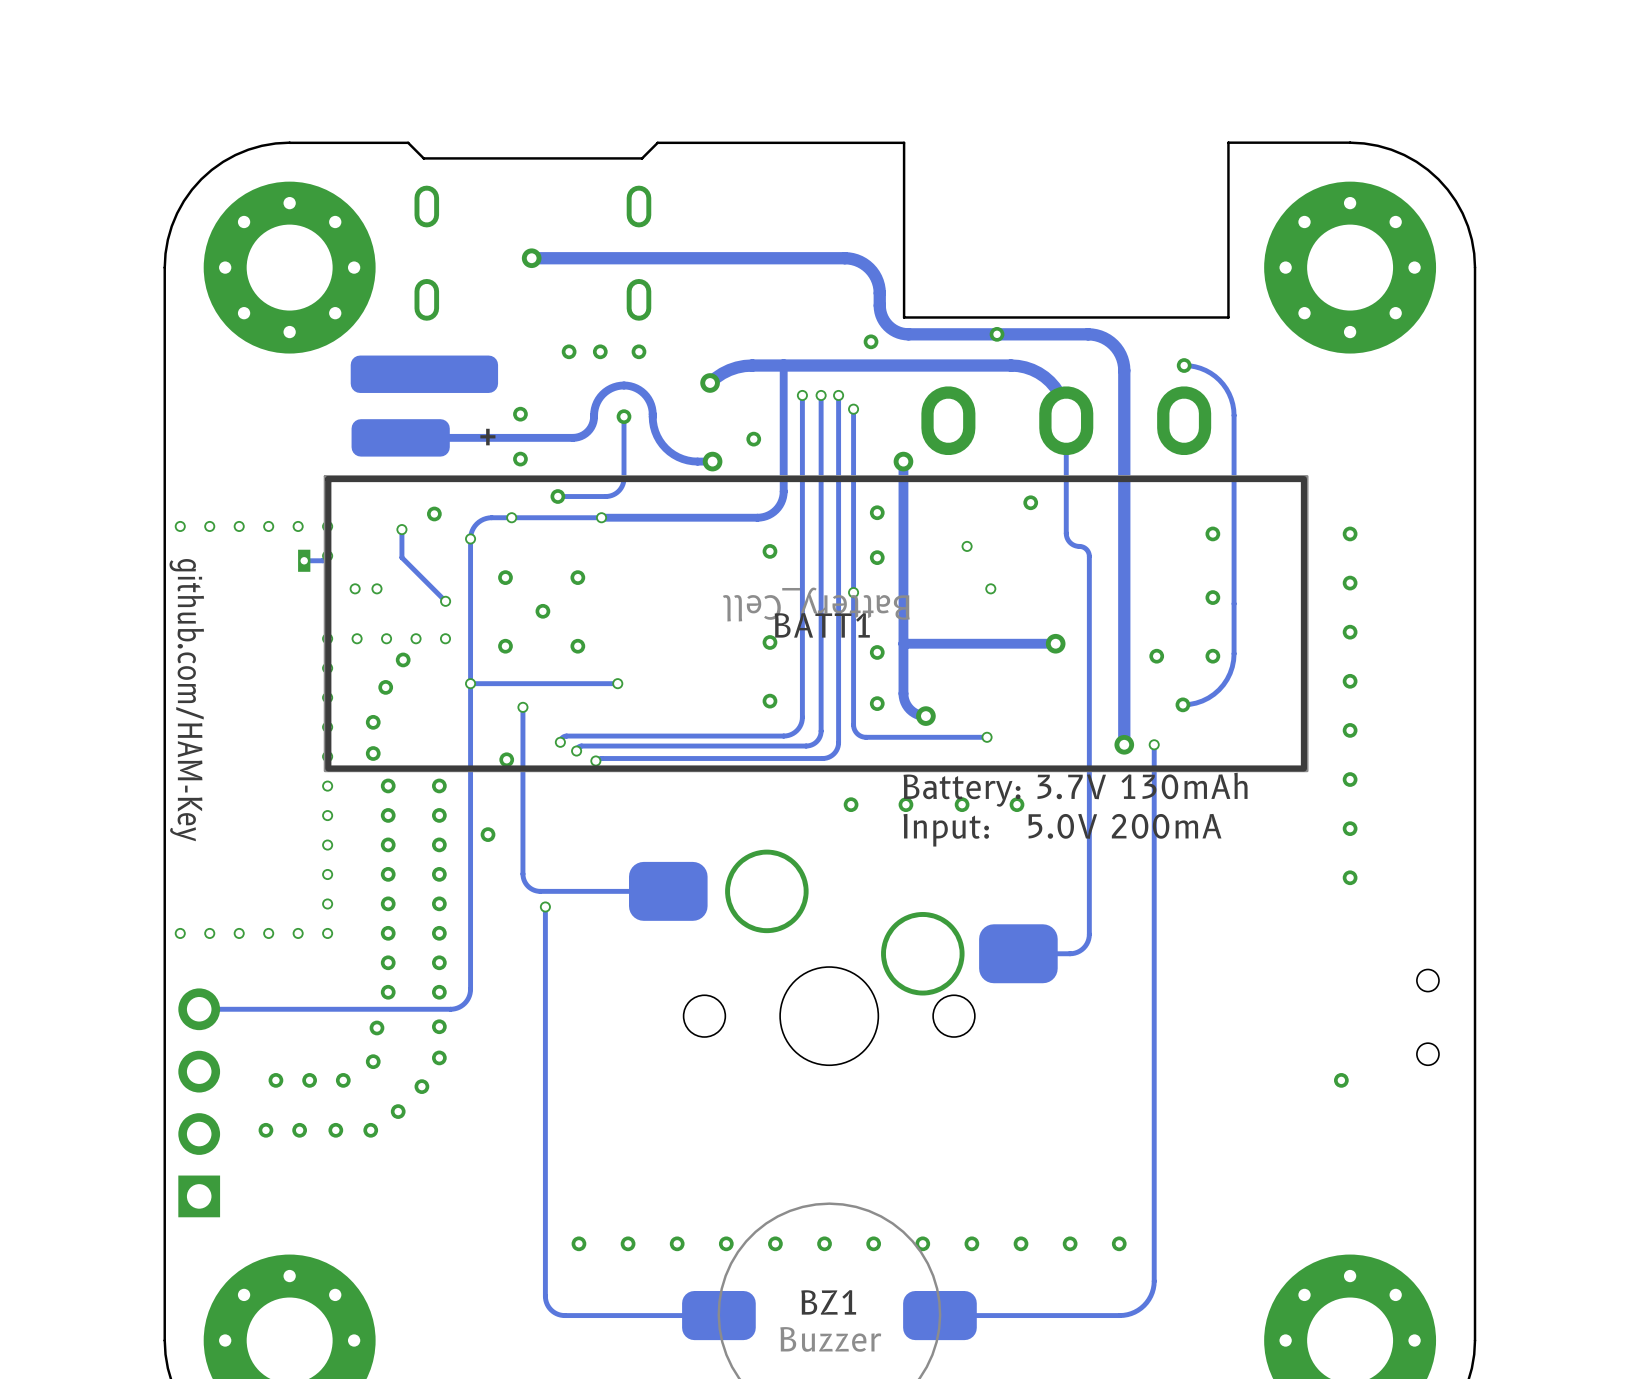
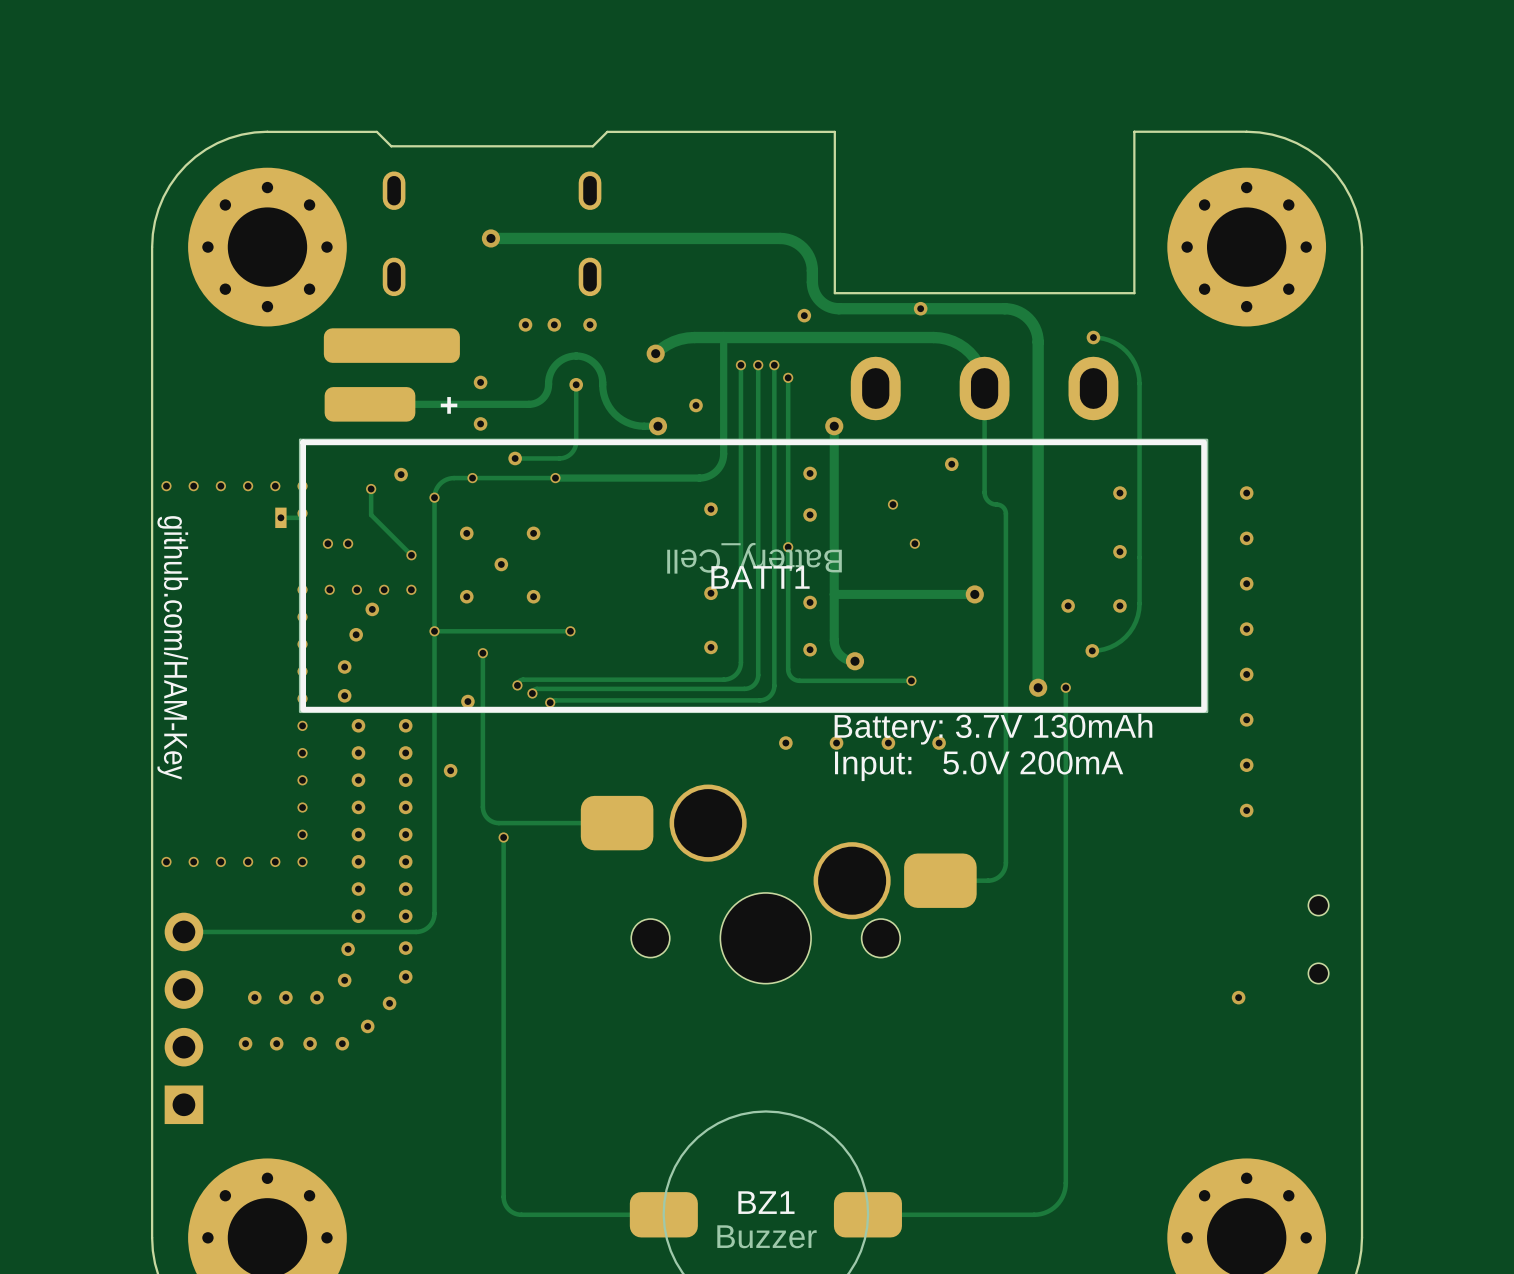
via: (578, 1243) -> none
via: (628, 1243) -> none
via: (677, 1243) -> none
via: (726, 1243) -> none
via: (775, 1243) -> none
via: (824, 1243) -> none
via: (873, 1243) -> none
via: (922, 1243) -> none
via: (971, 1243) -> none
via: (1021, 1243) -> none
via: (1070, 1243) -> none
via: (1119, 1243) -> none

